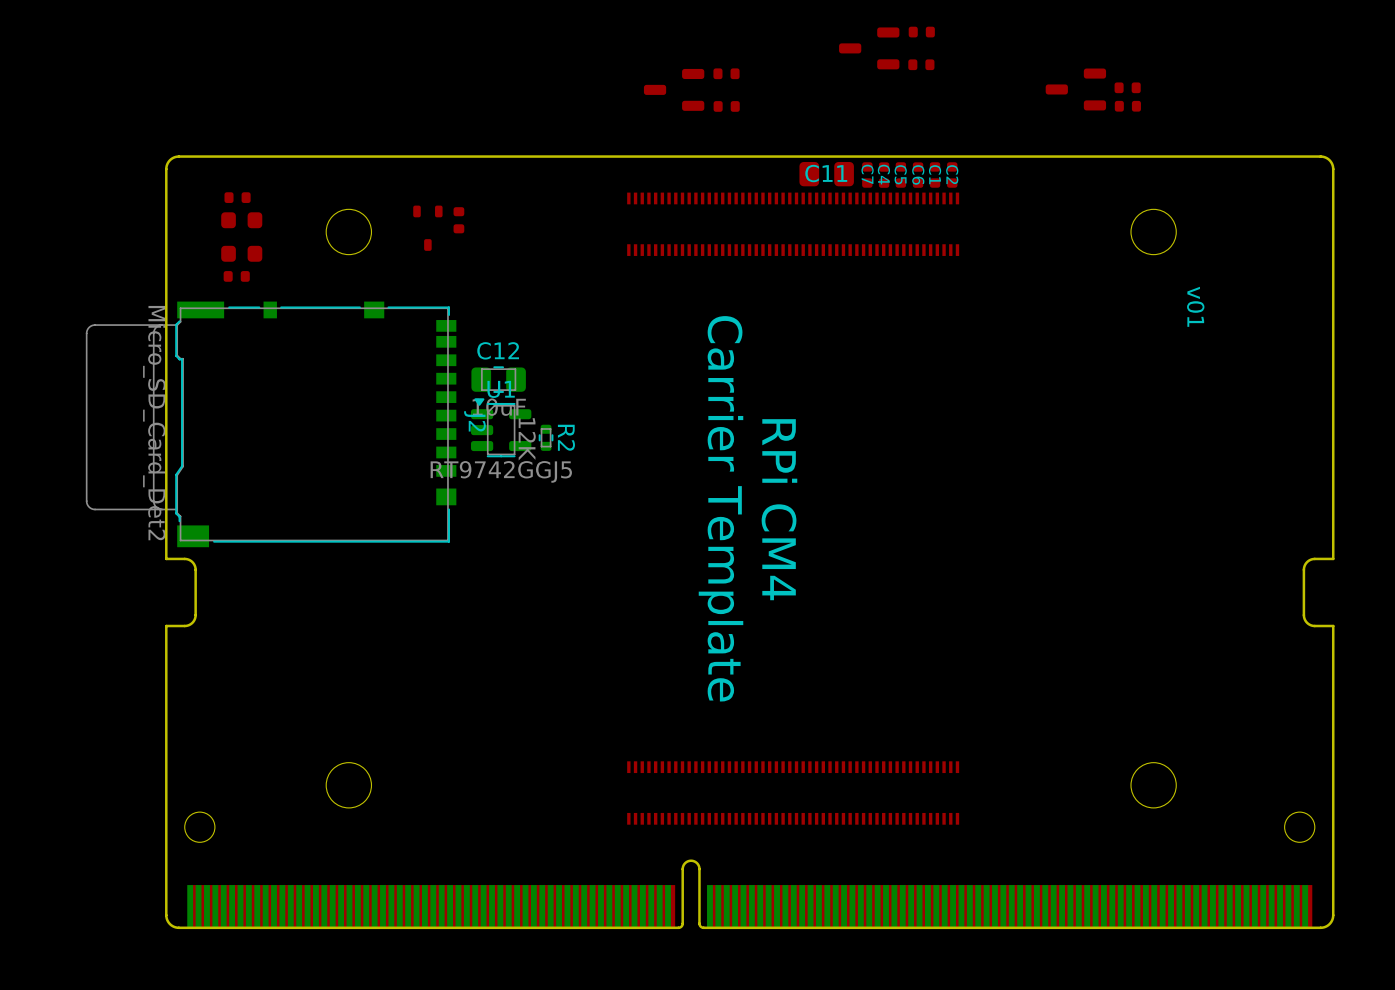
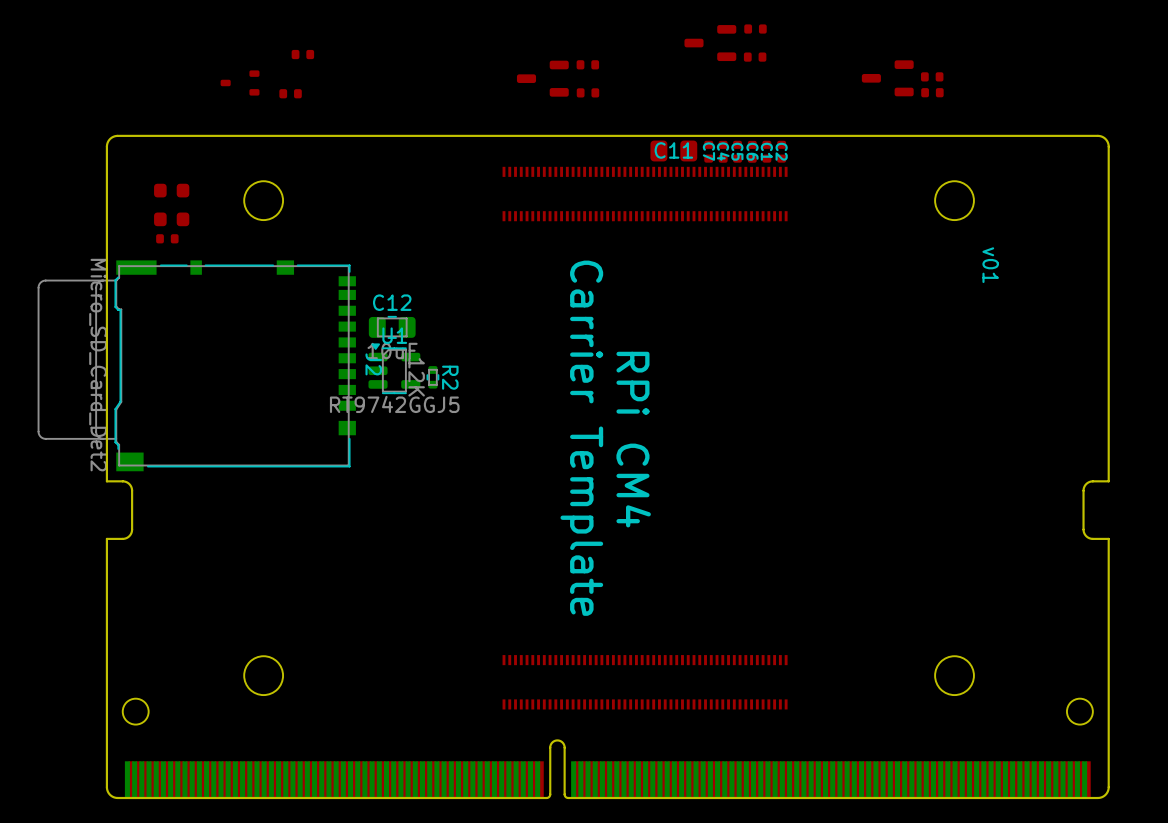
part: none -> (302, 54)
part: none -> (290, 93)
part: (237, 197) -> none
part: (458, 220) -> none
part rotation: 0° (427, 228) -> 90° clockwise (240, 82)
part position: (427, 228) -> (240, 82)

